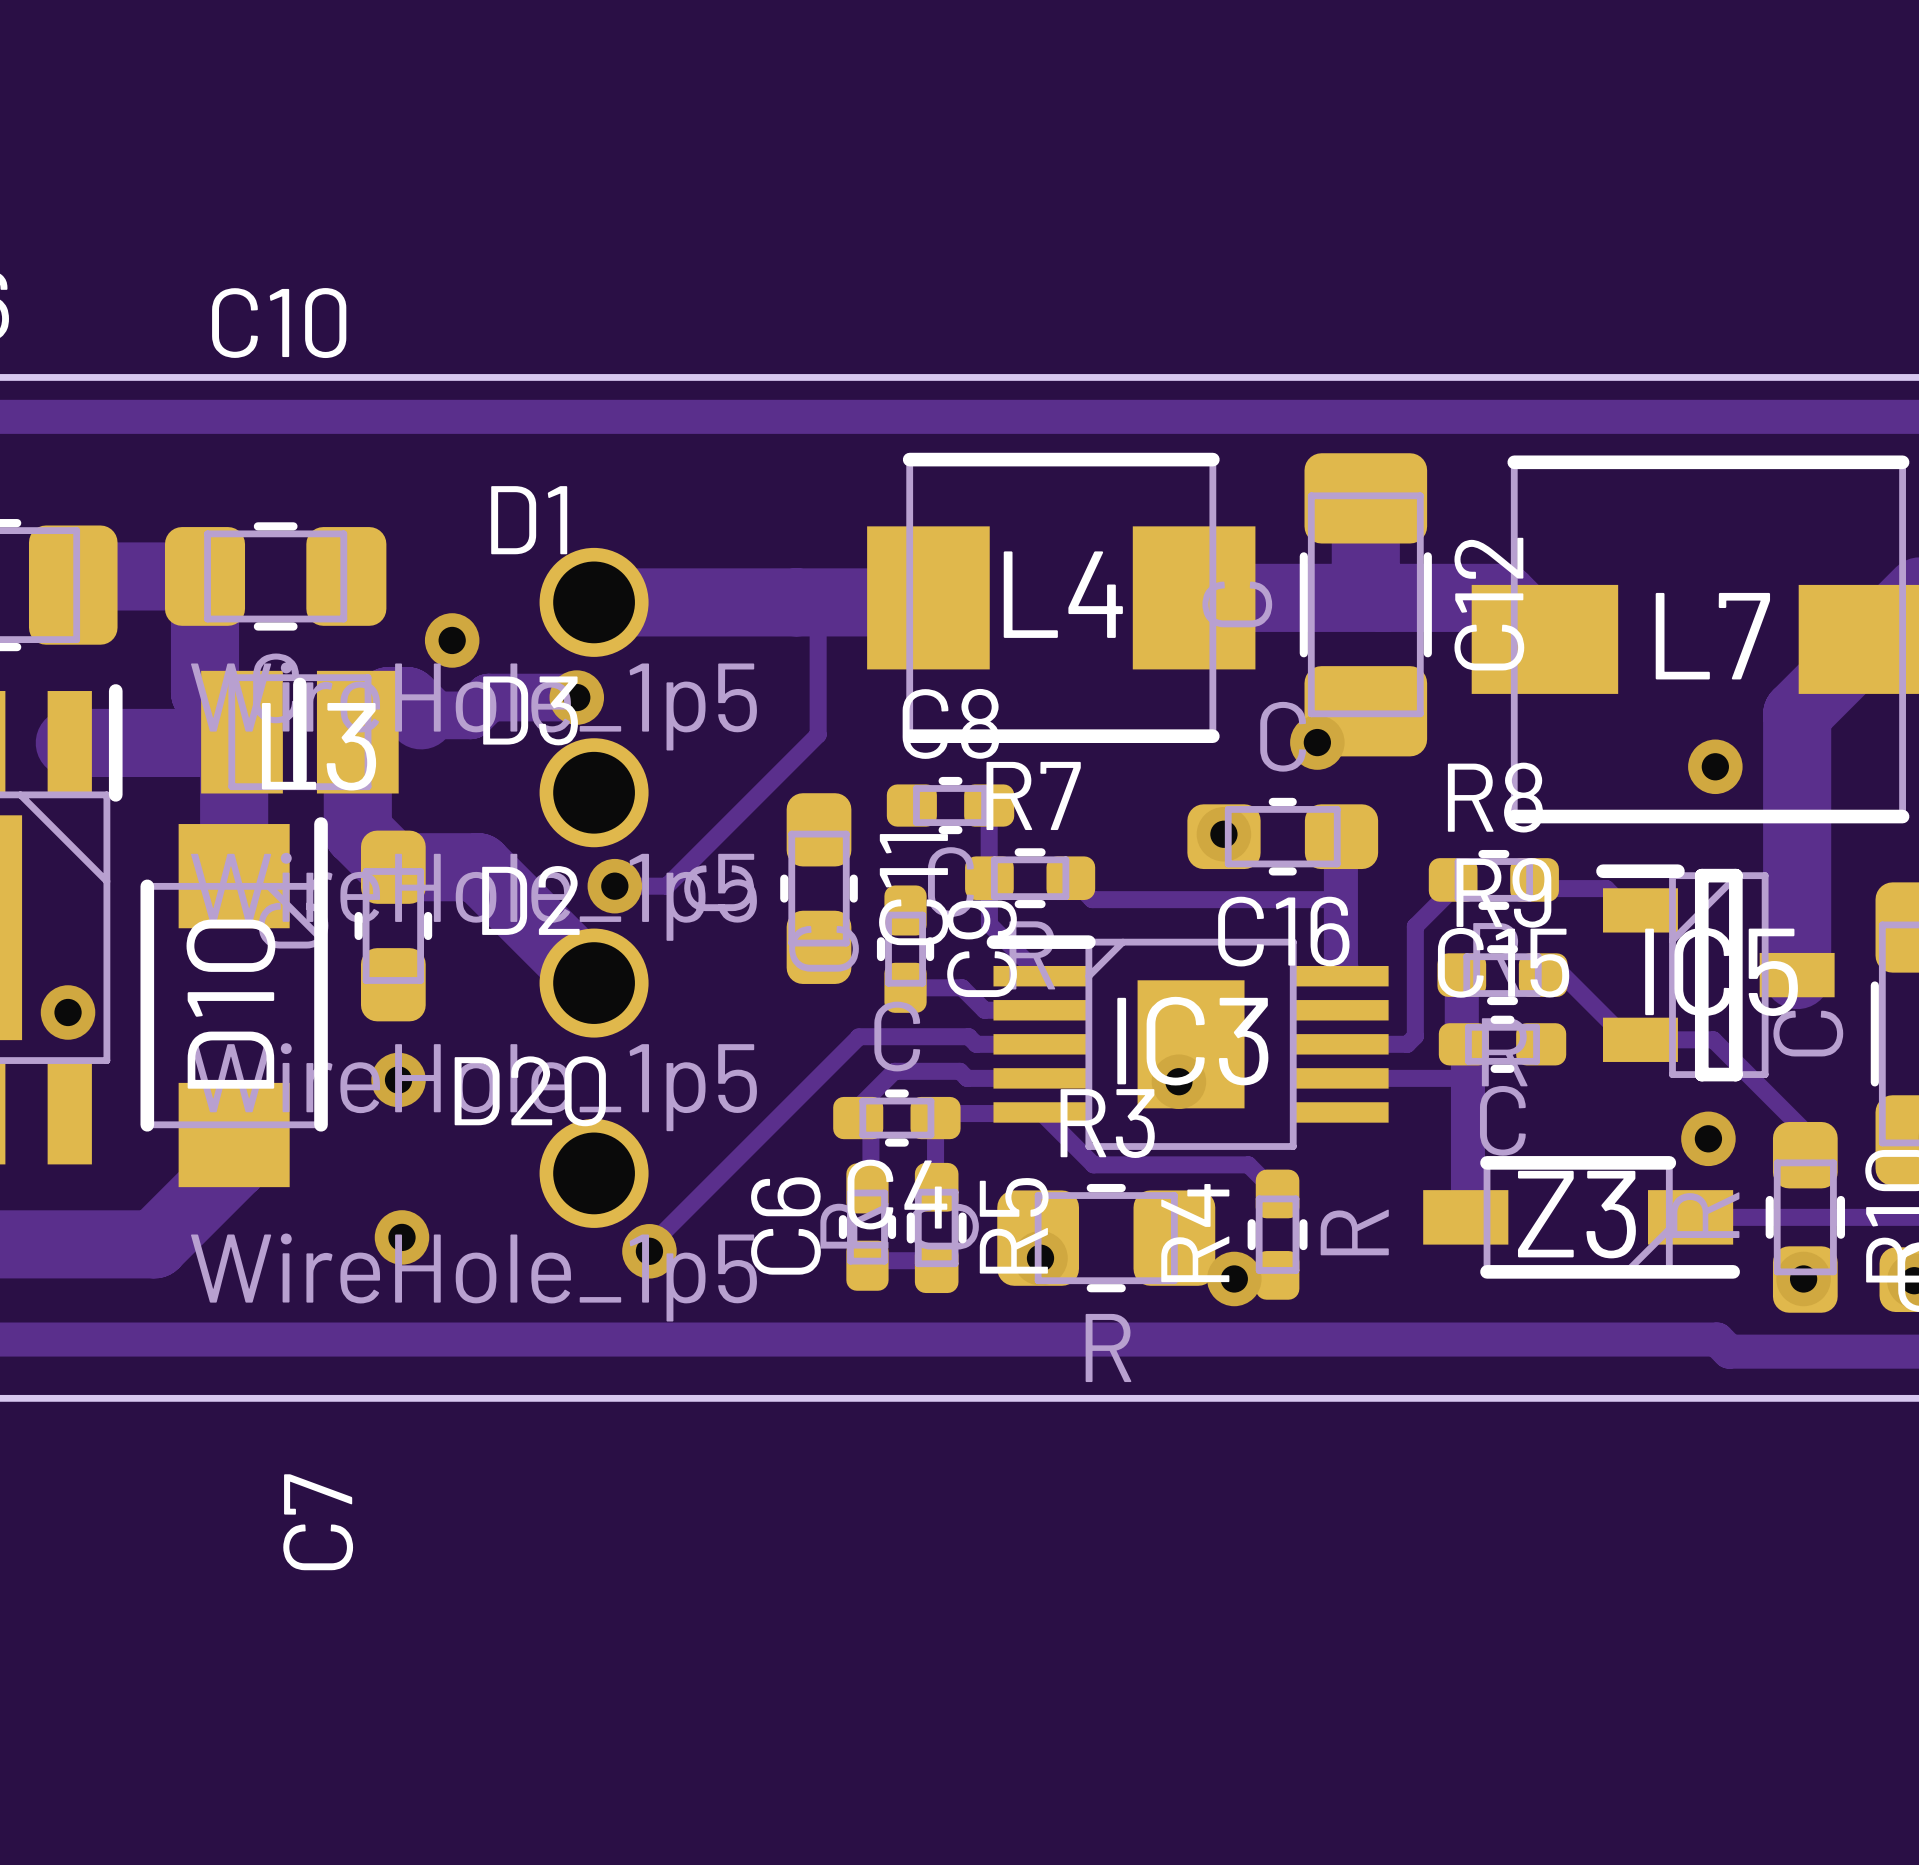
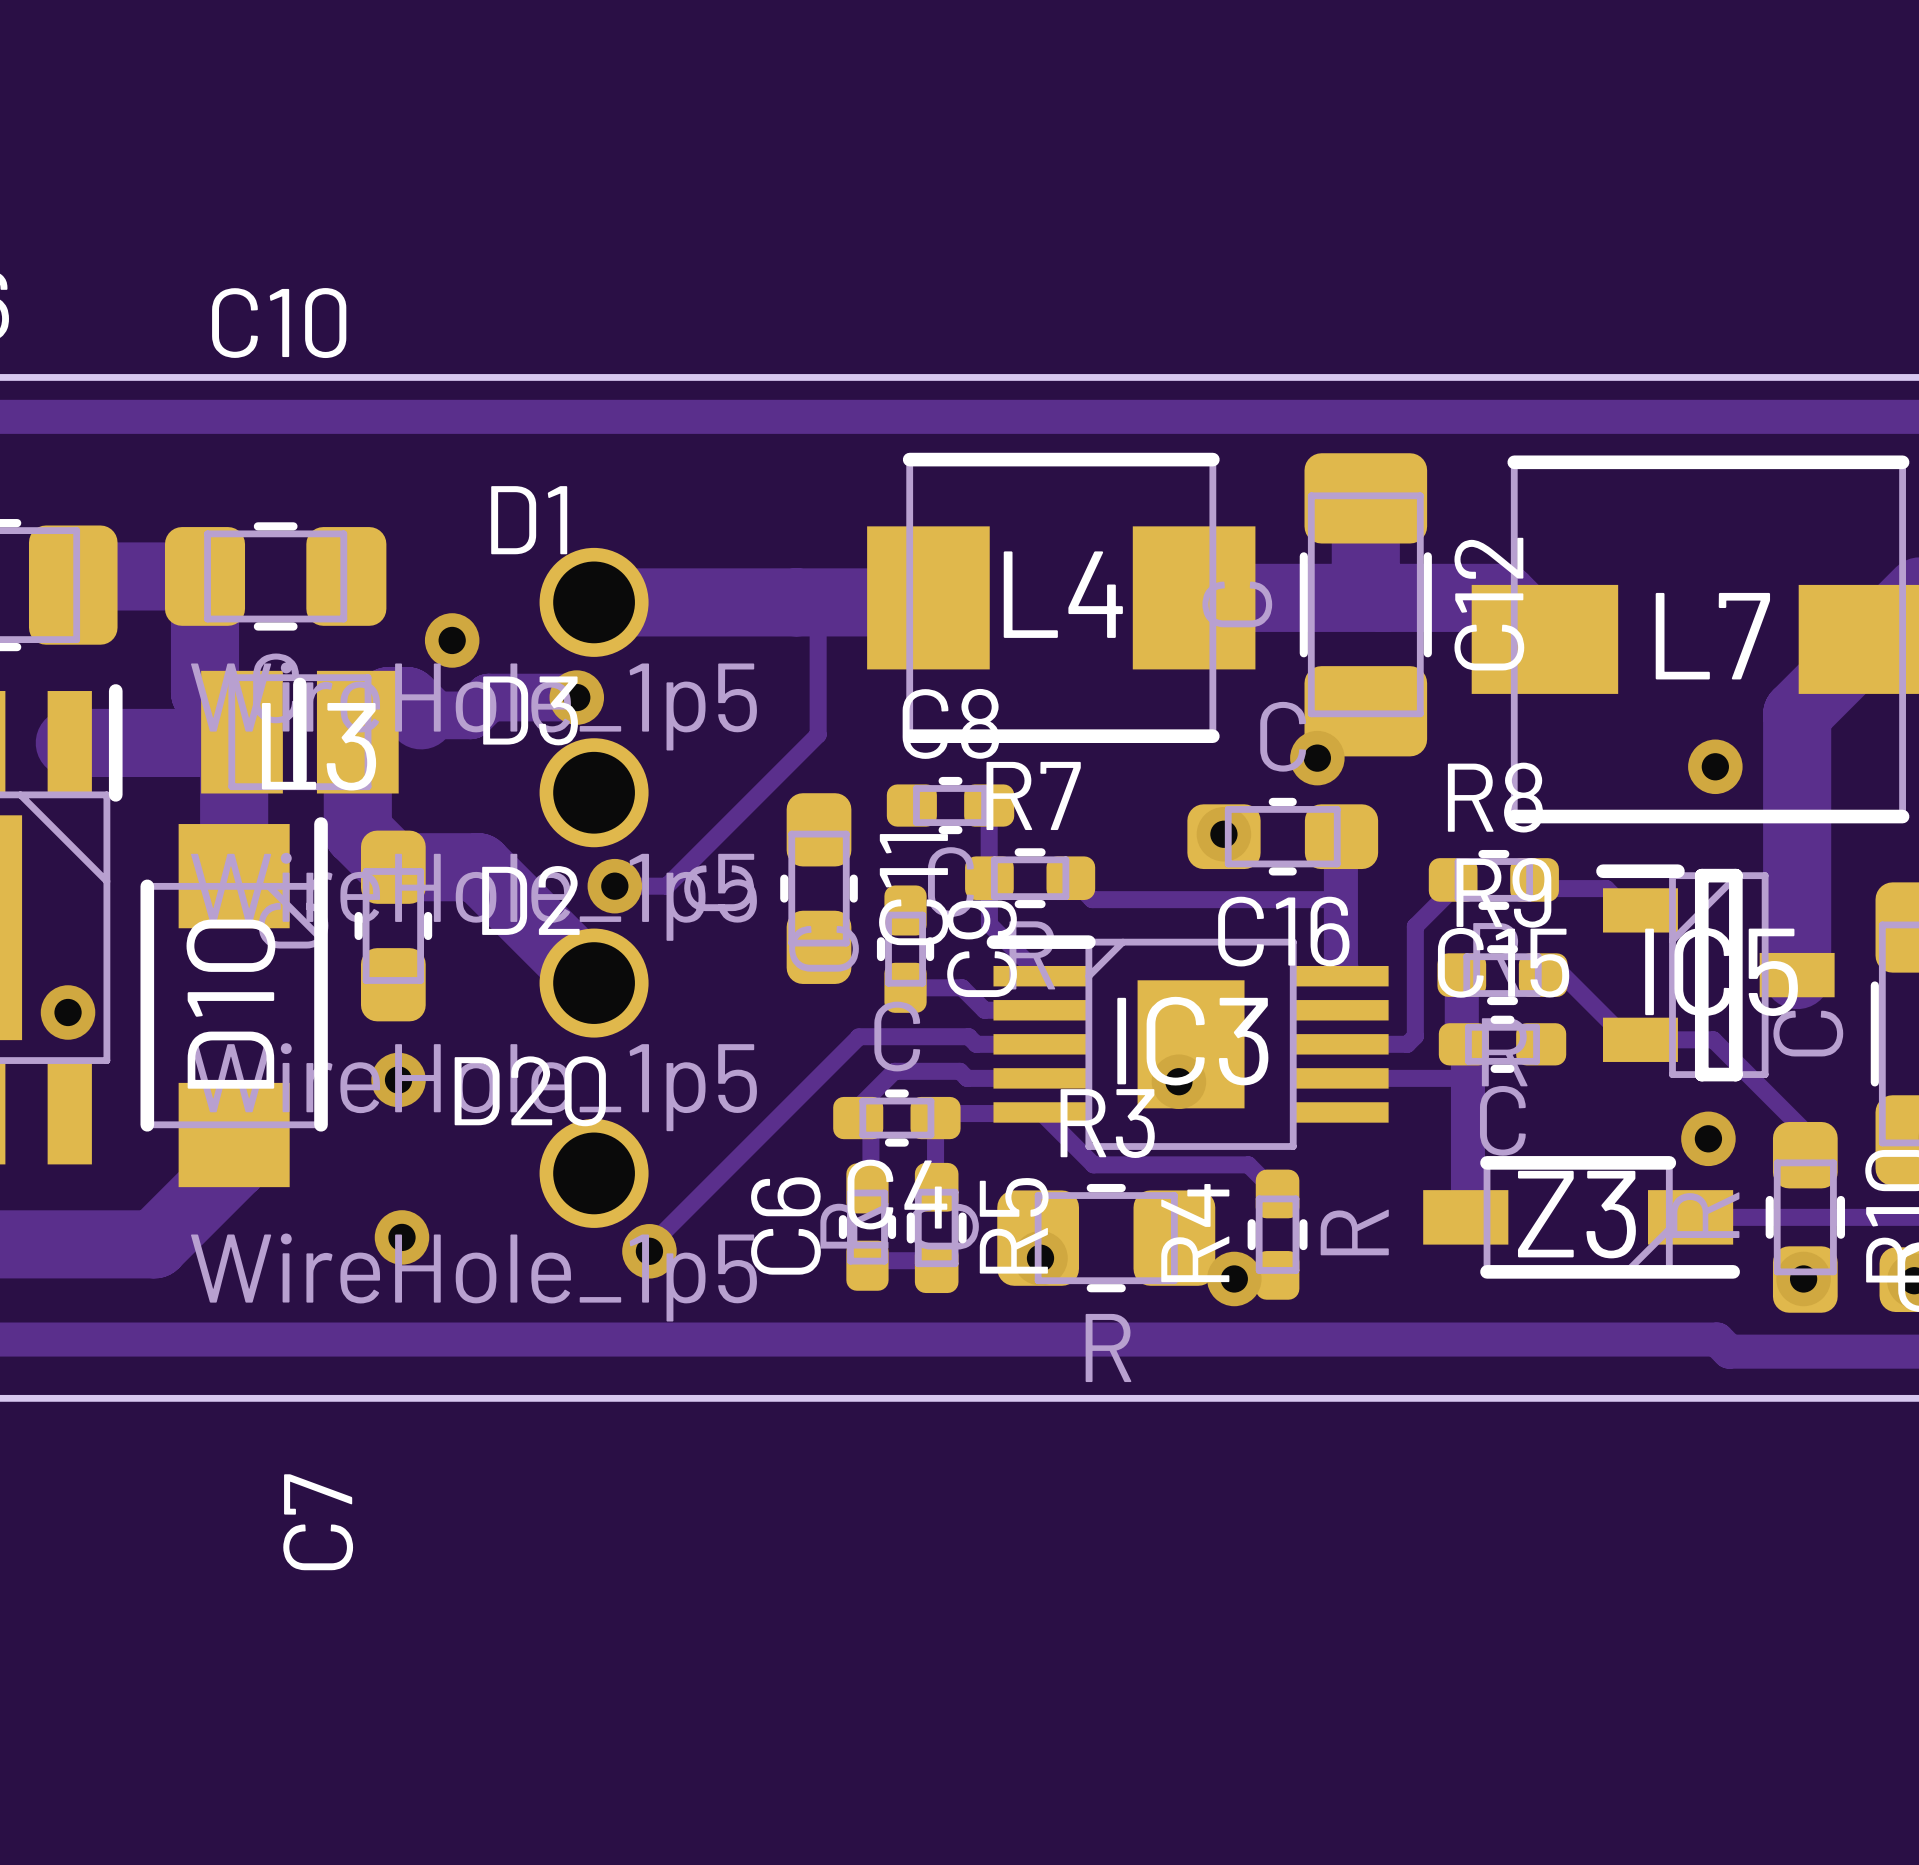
via position: (1317, 742) -> (1317, 758)

